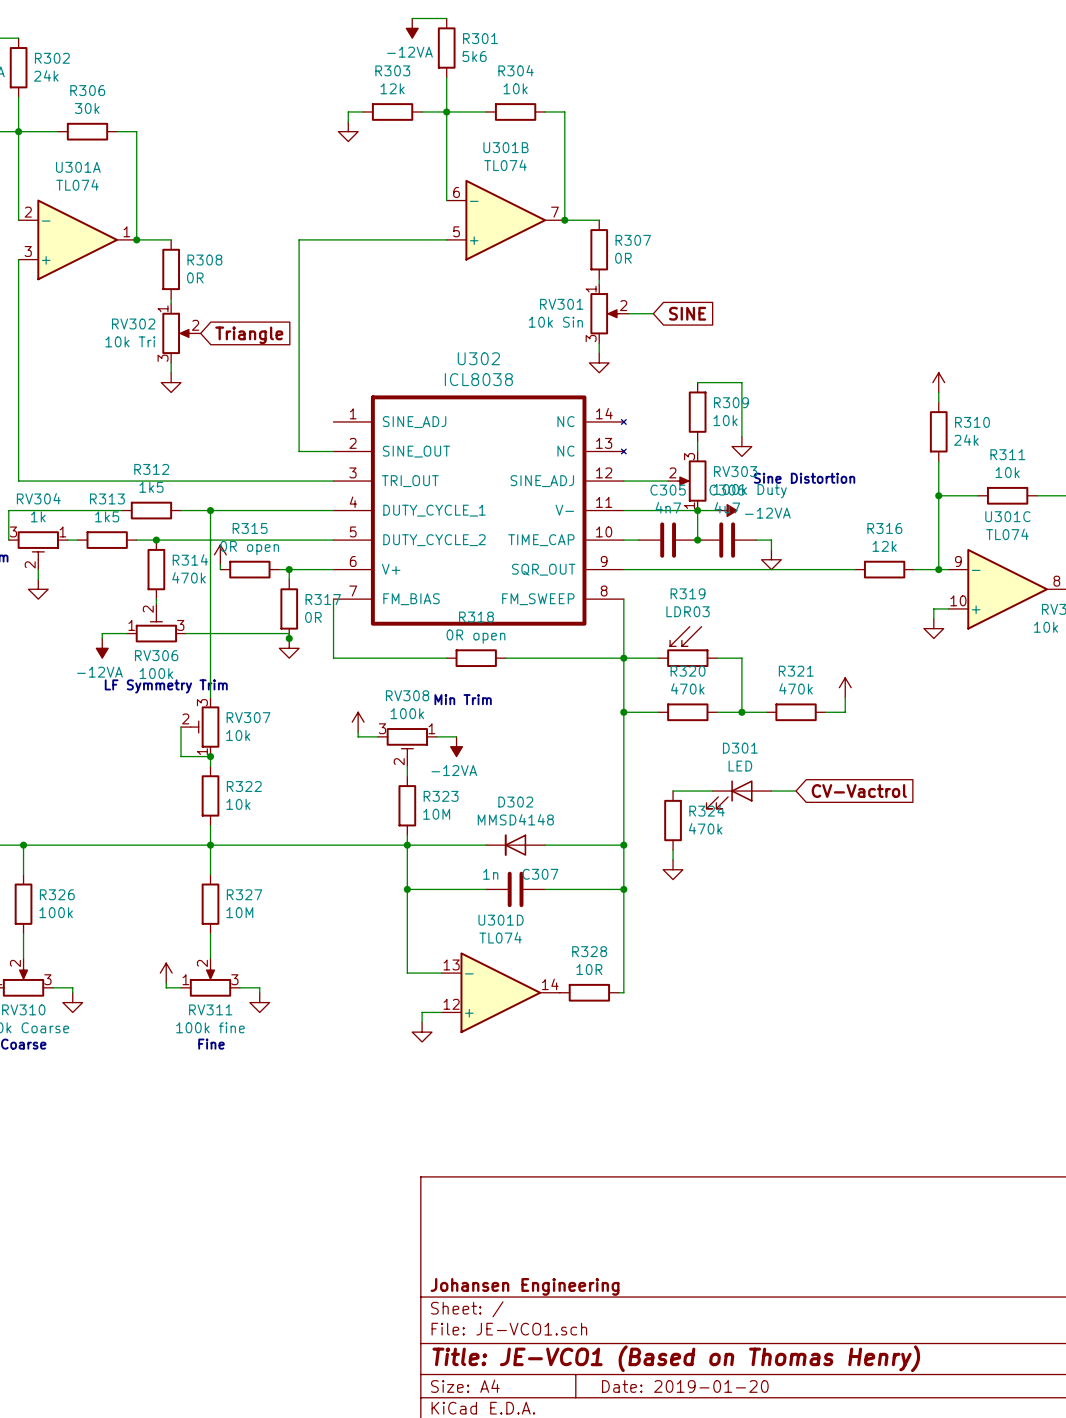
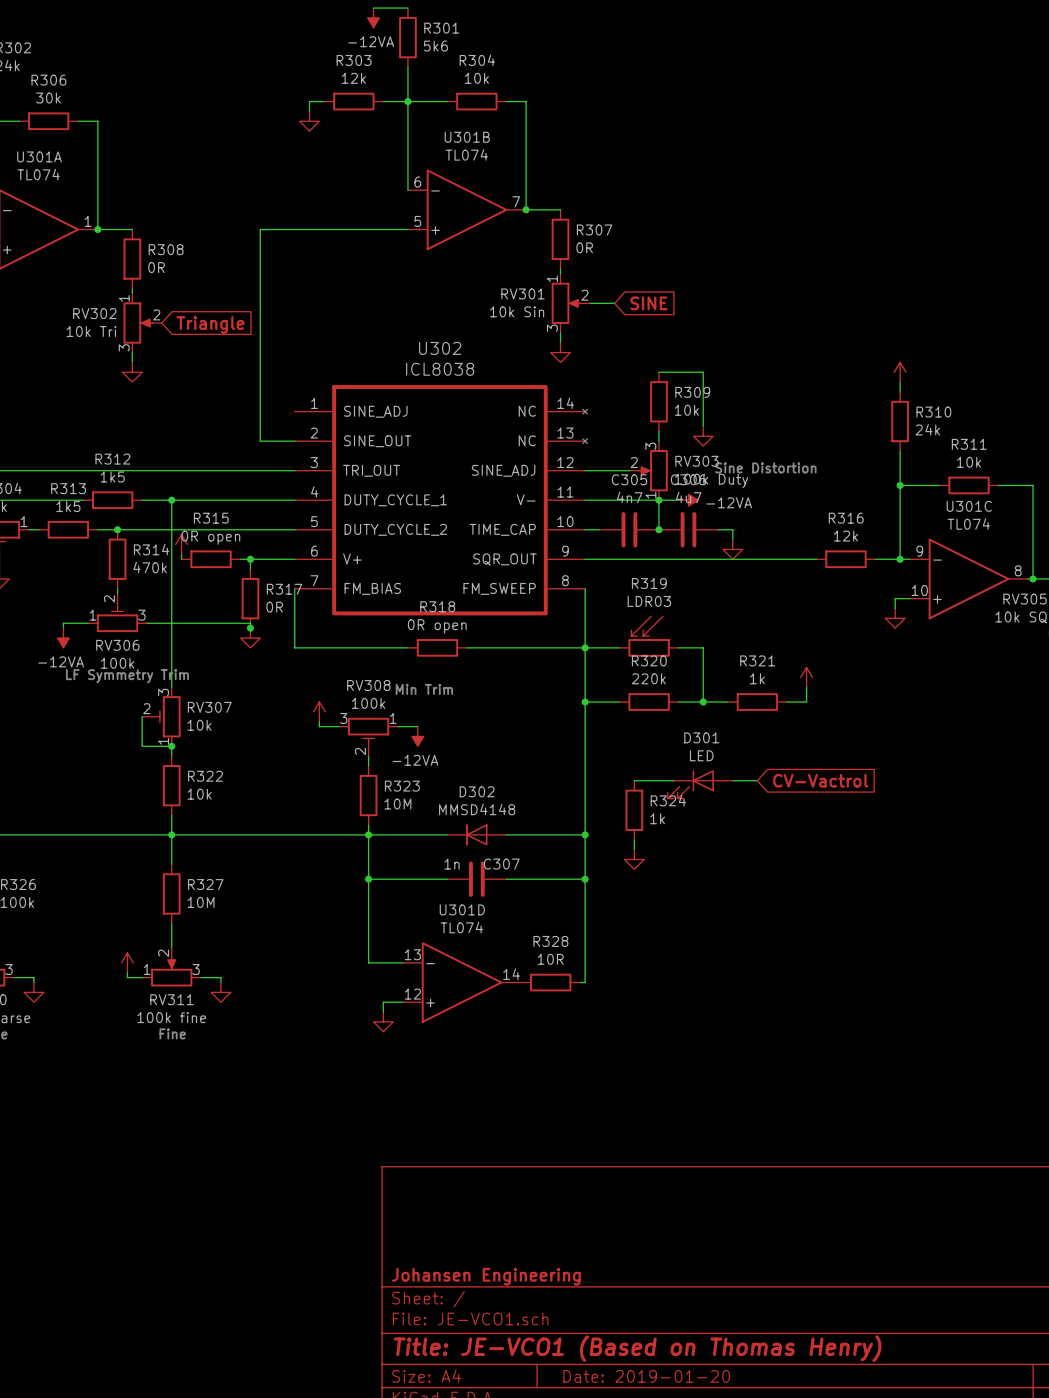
R320 value: 470k (687, 688) -> 220k (648, 678)
R321 value: 470k (796, 688) -> 1k (757, 678)
R324 value: 470k (705, 828) -> 1k (657, 818)

